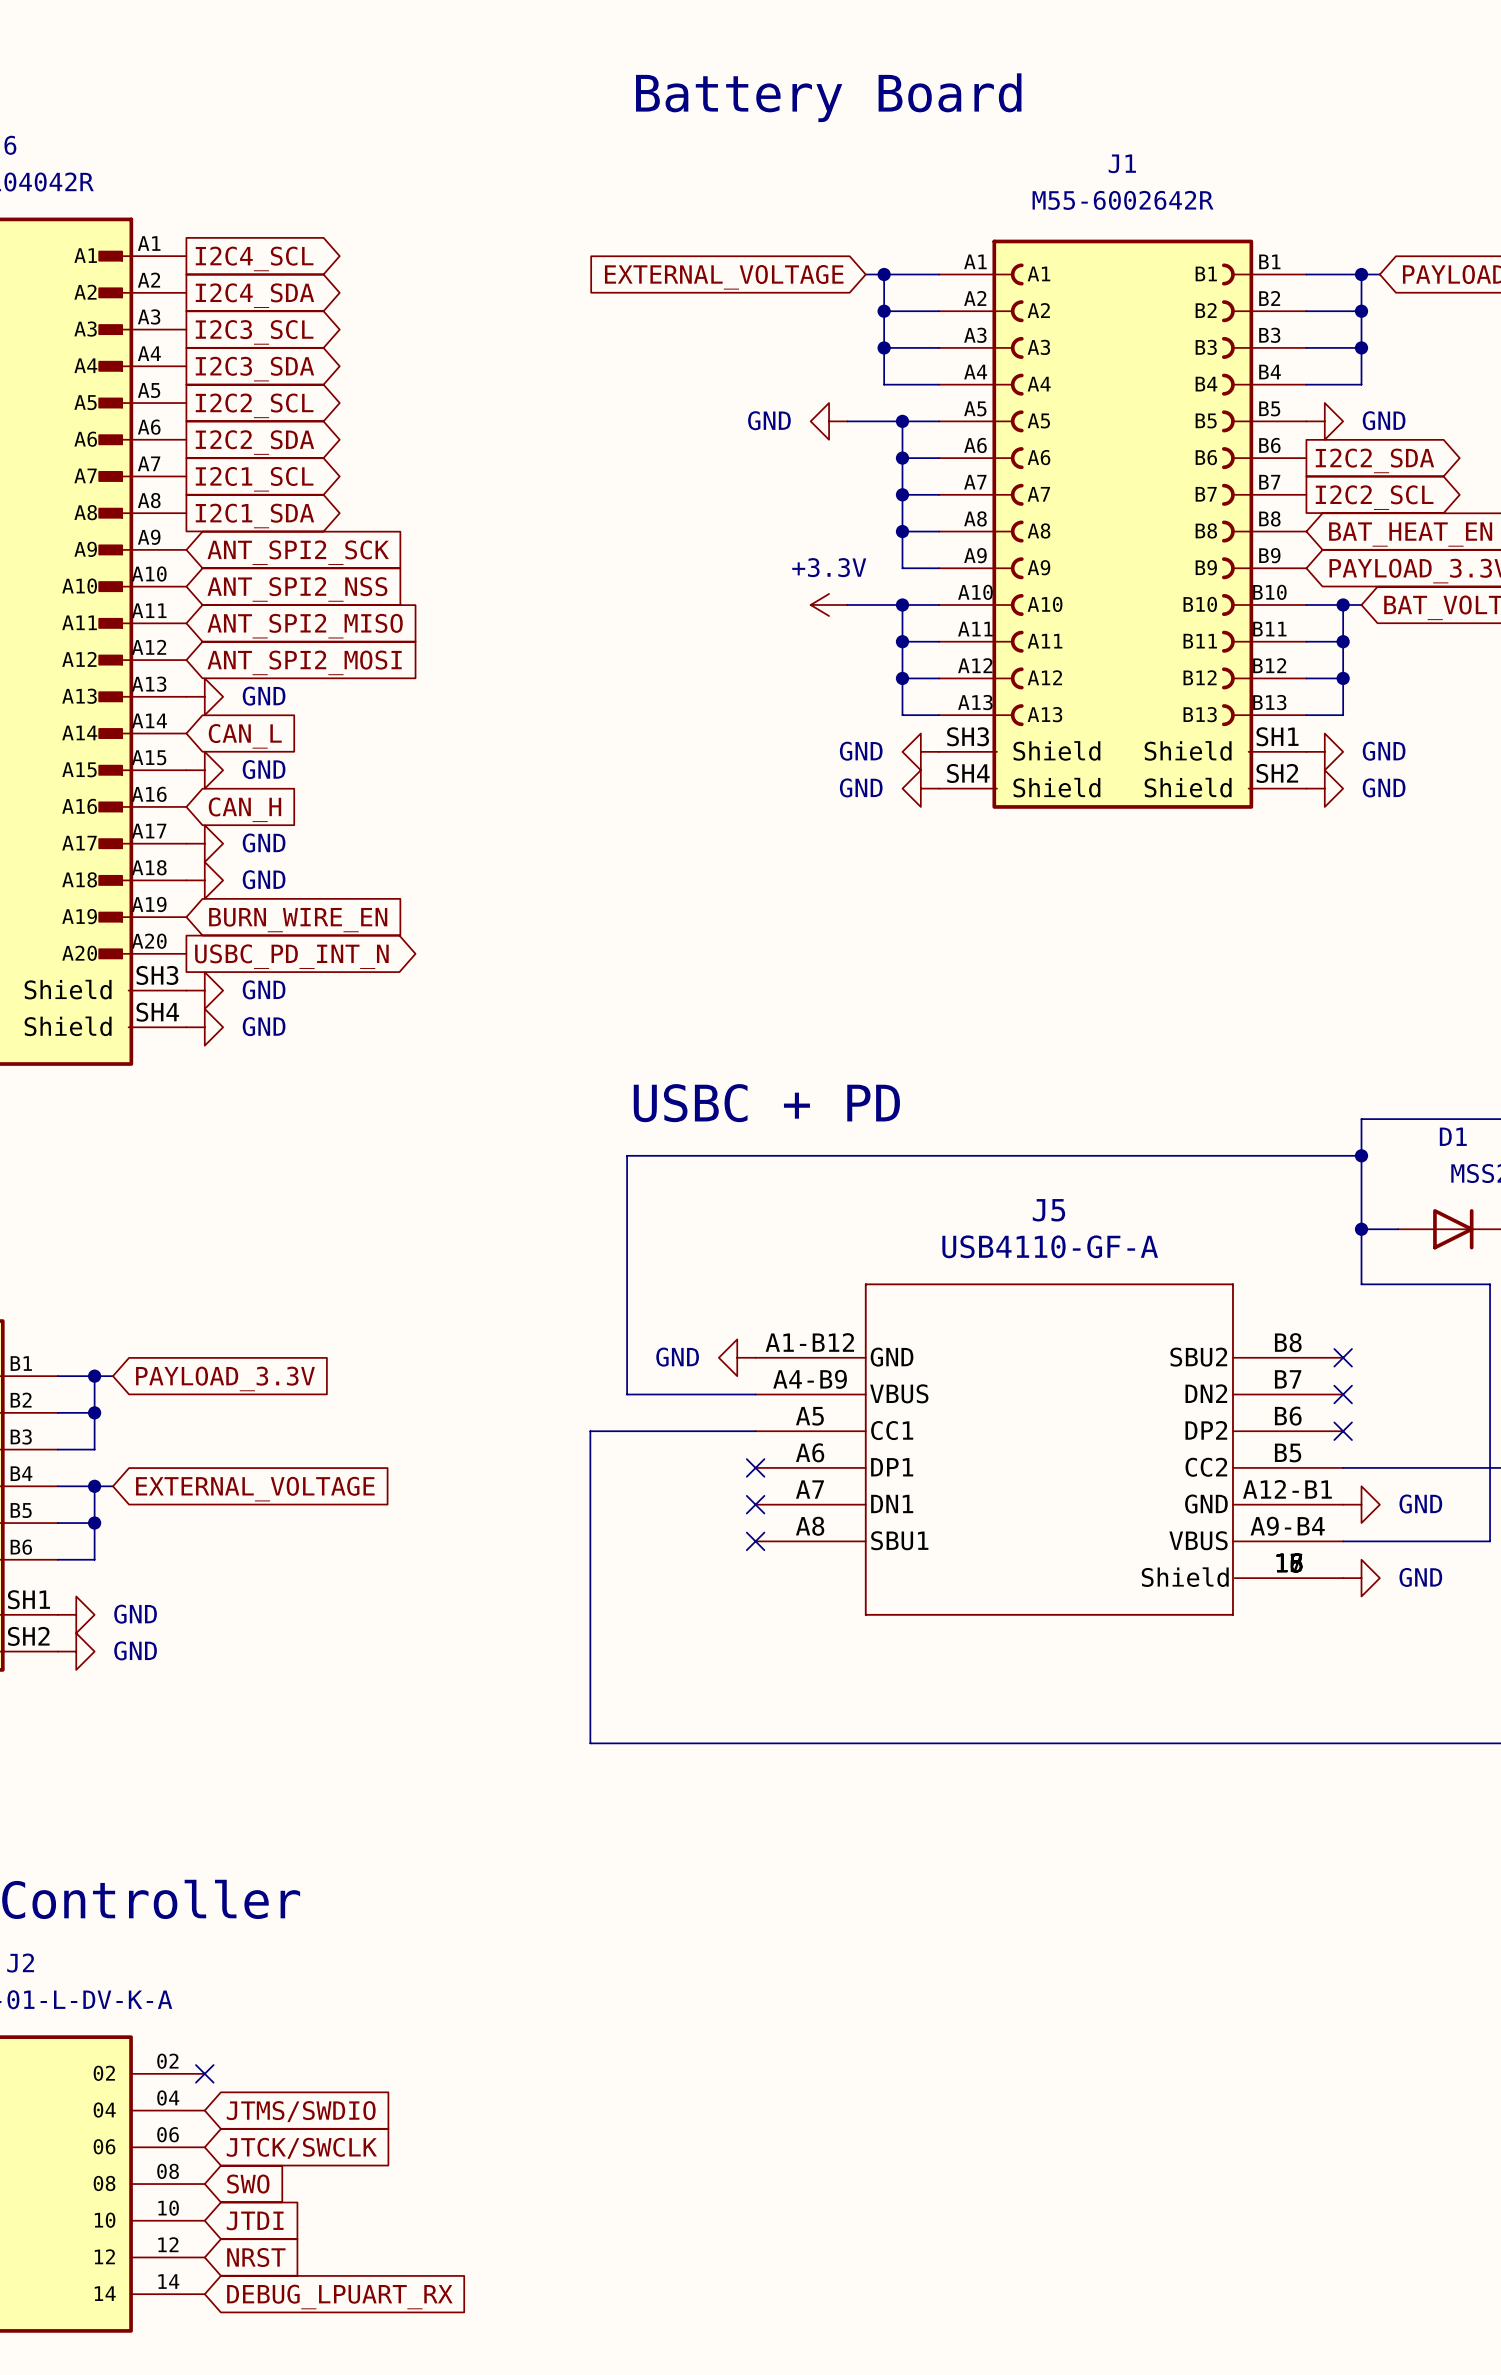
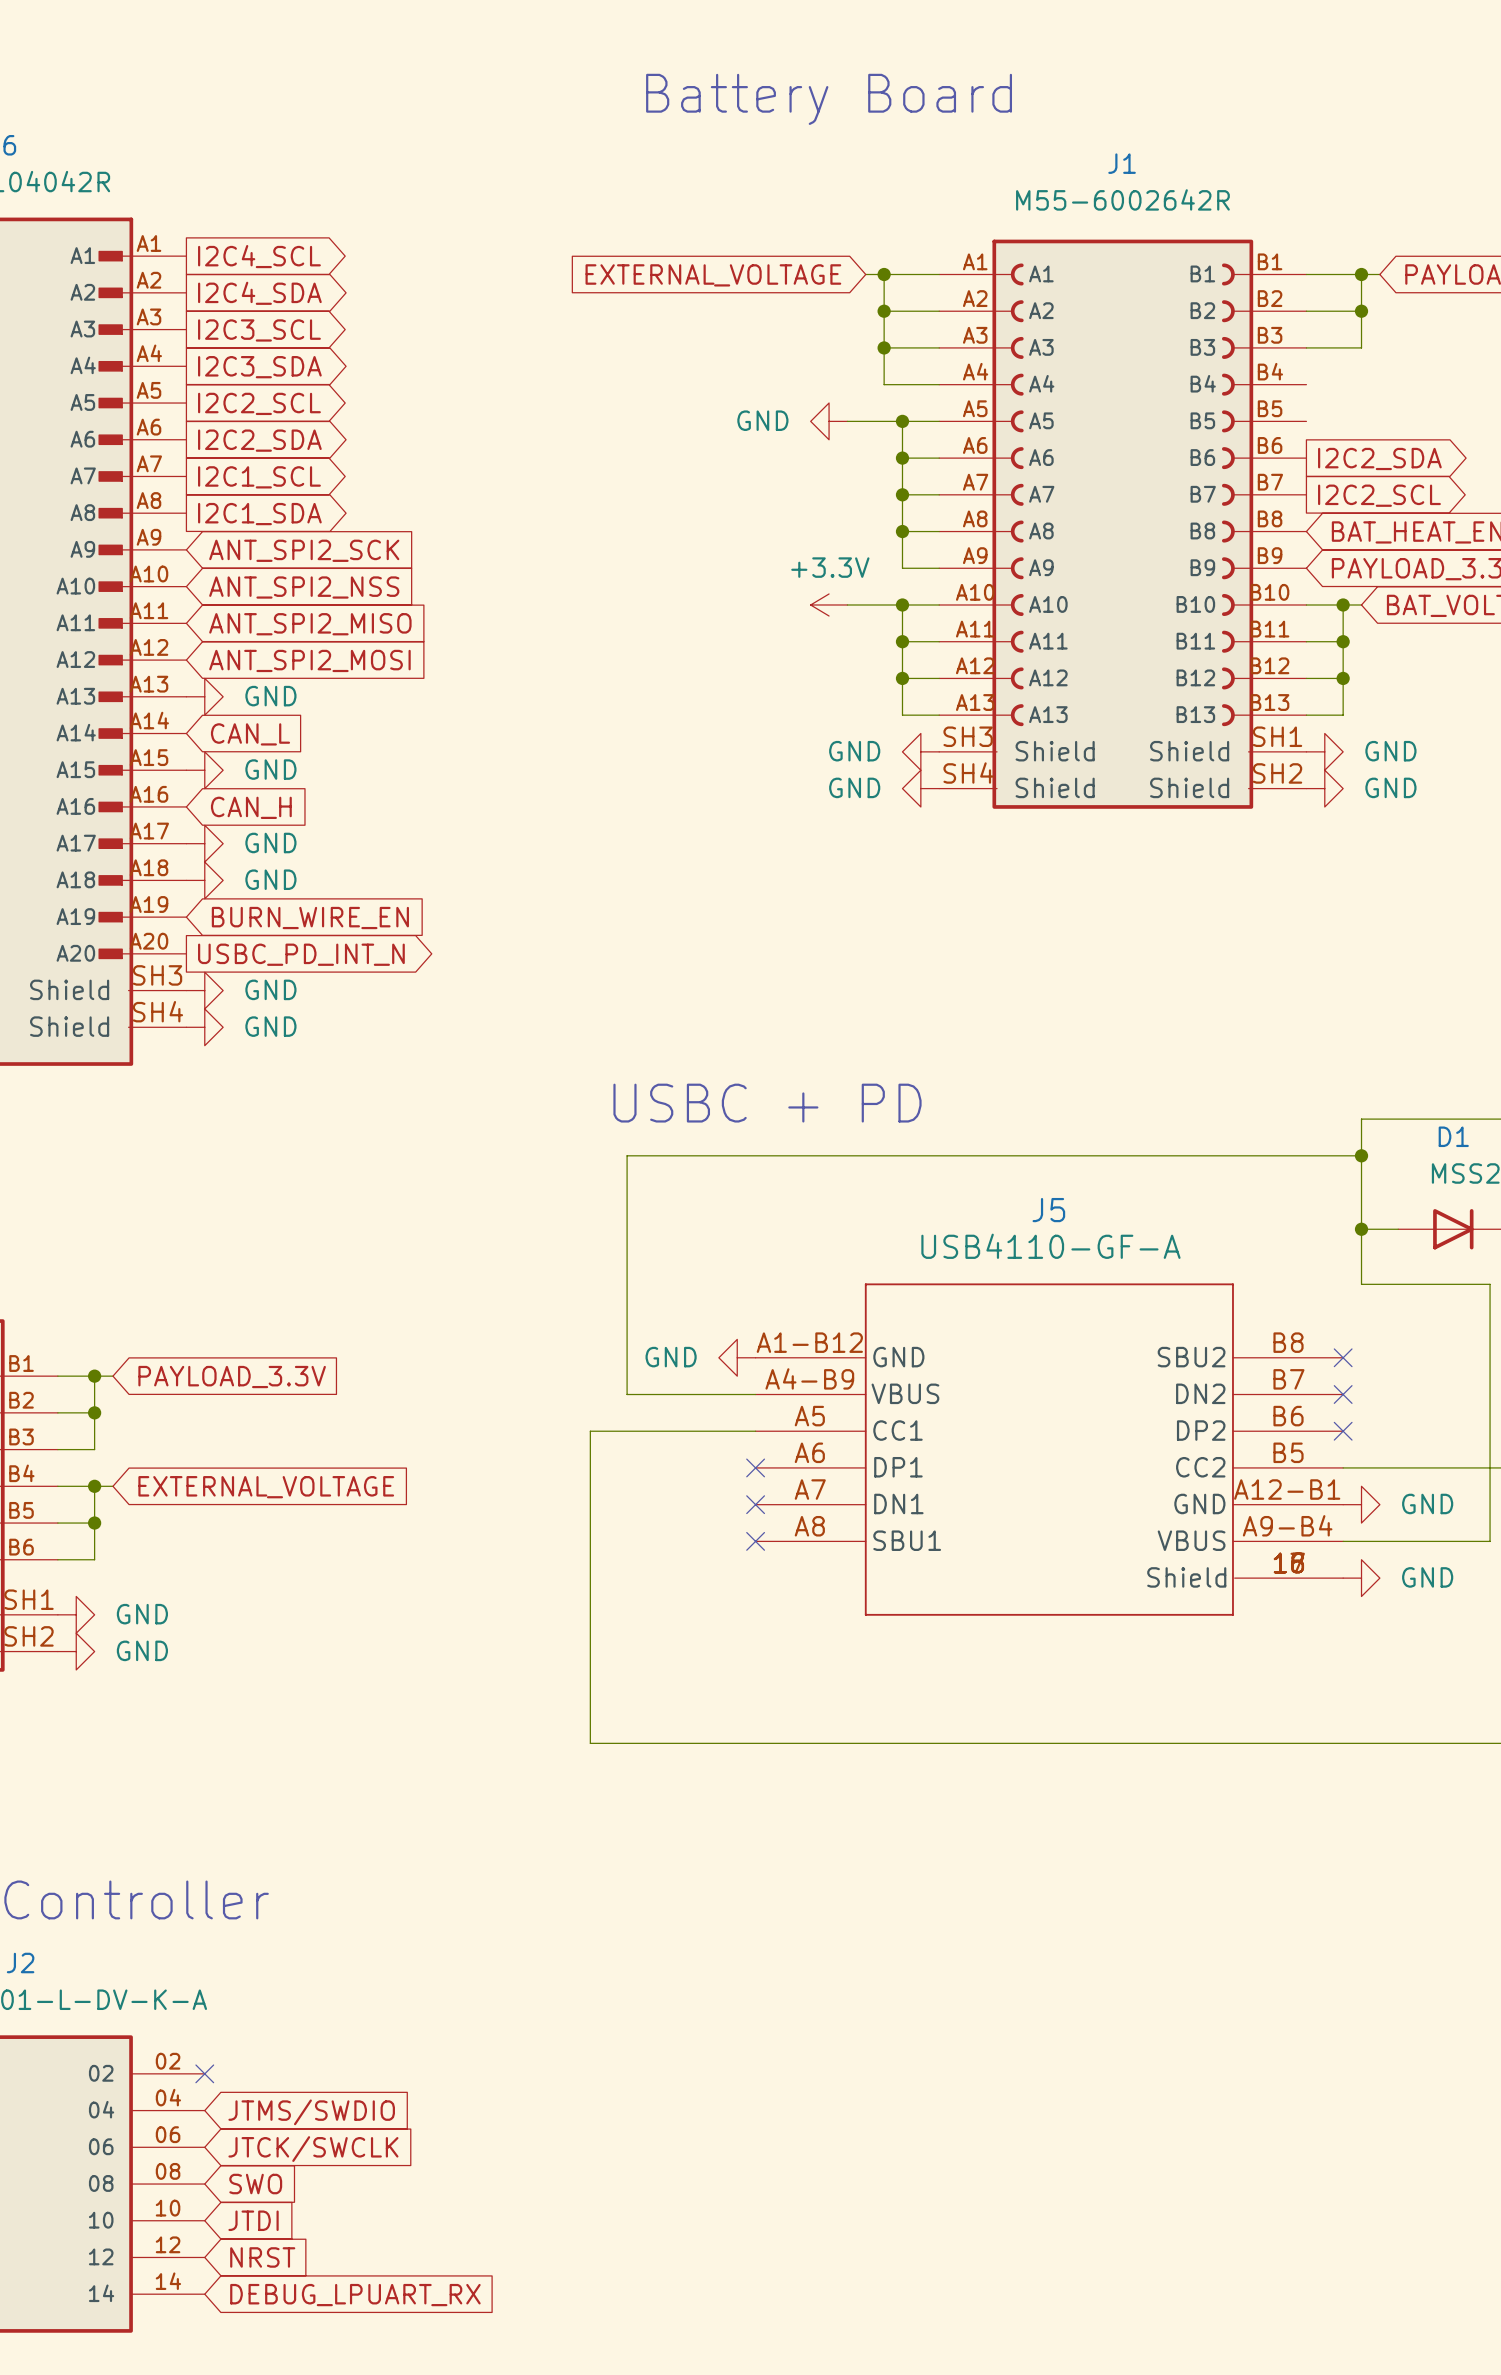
wire: (1361, 347) (1361, 384) (1306, 384) -> none
junction: (1361, 347) -> none
power symbol: GND (1324, 421) -> none

